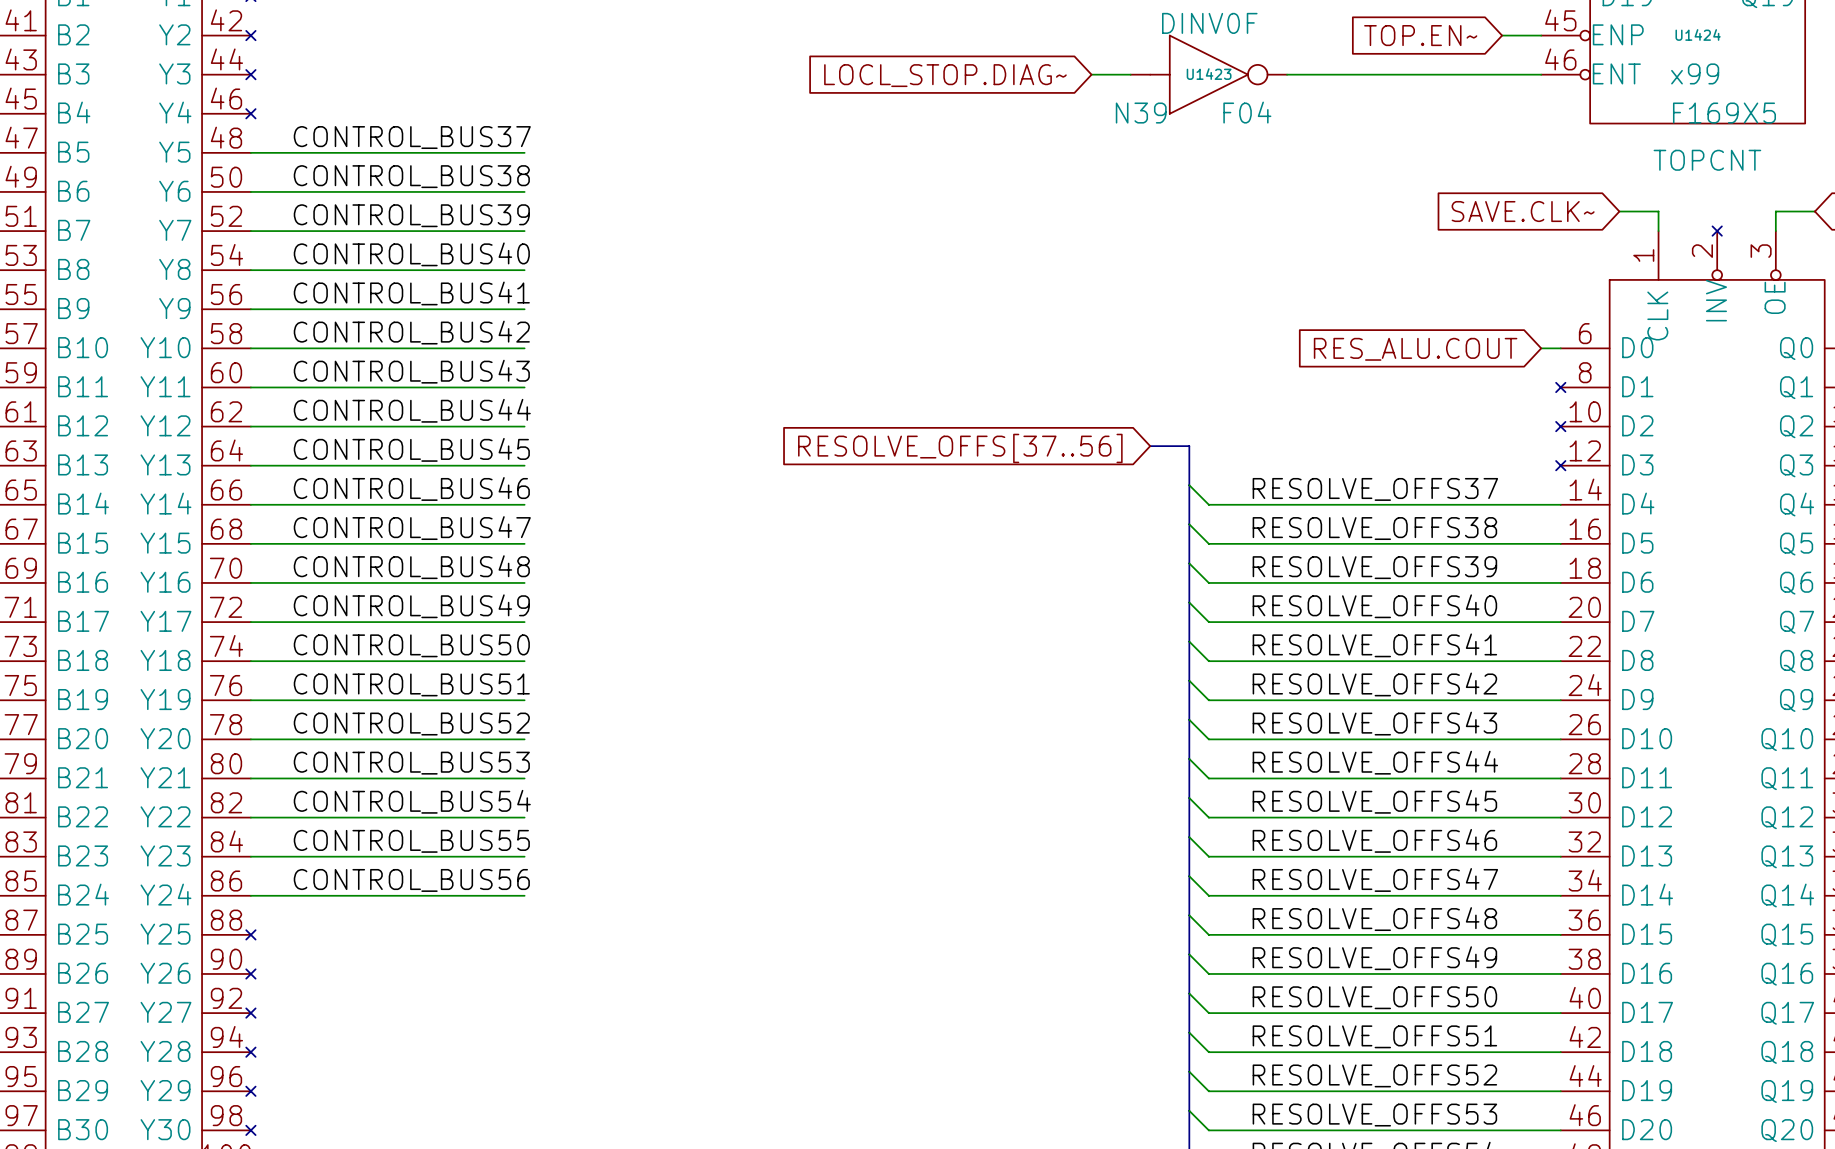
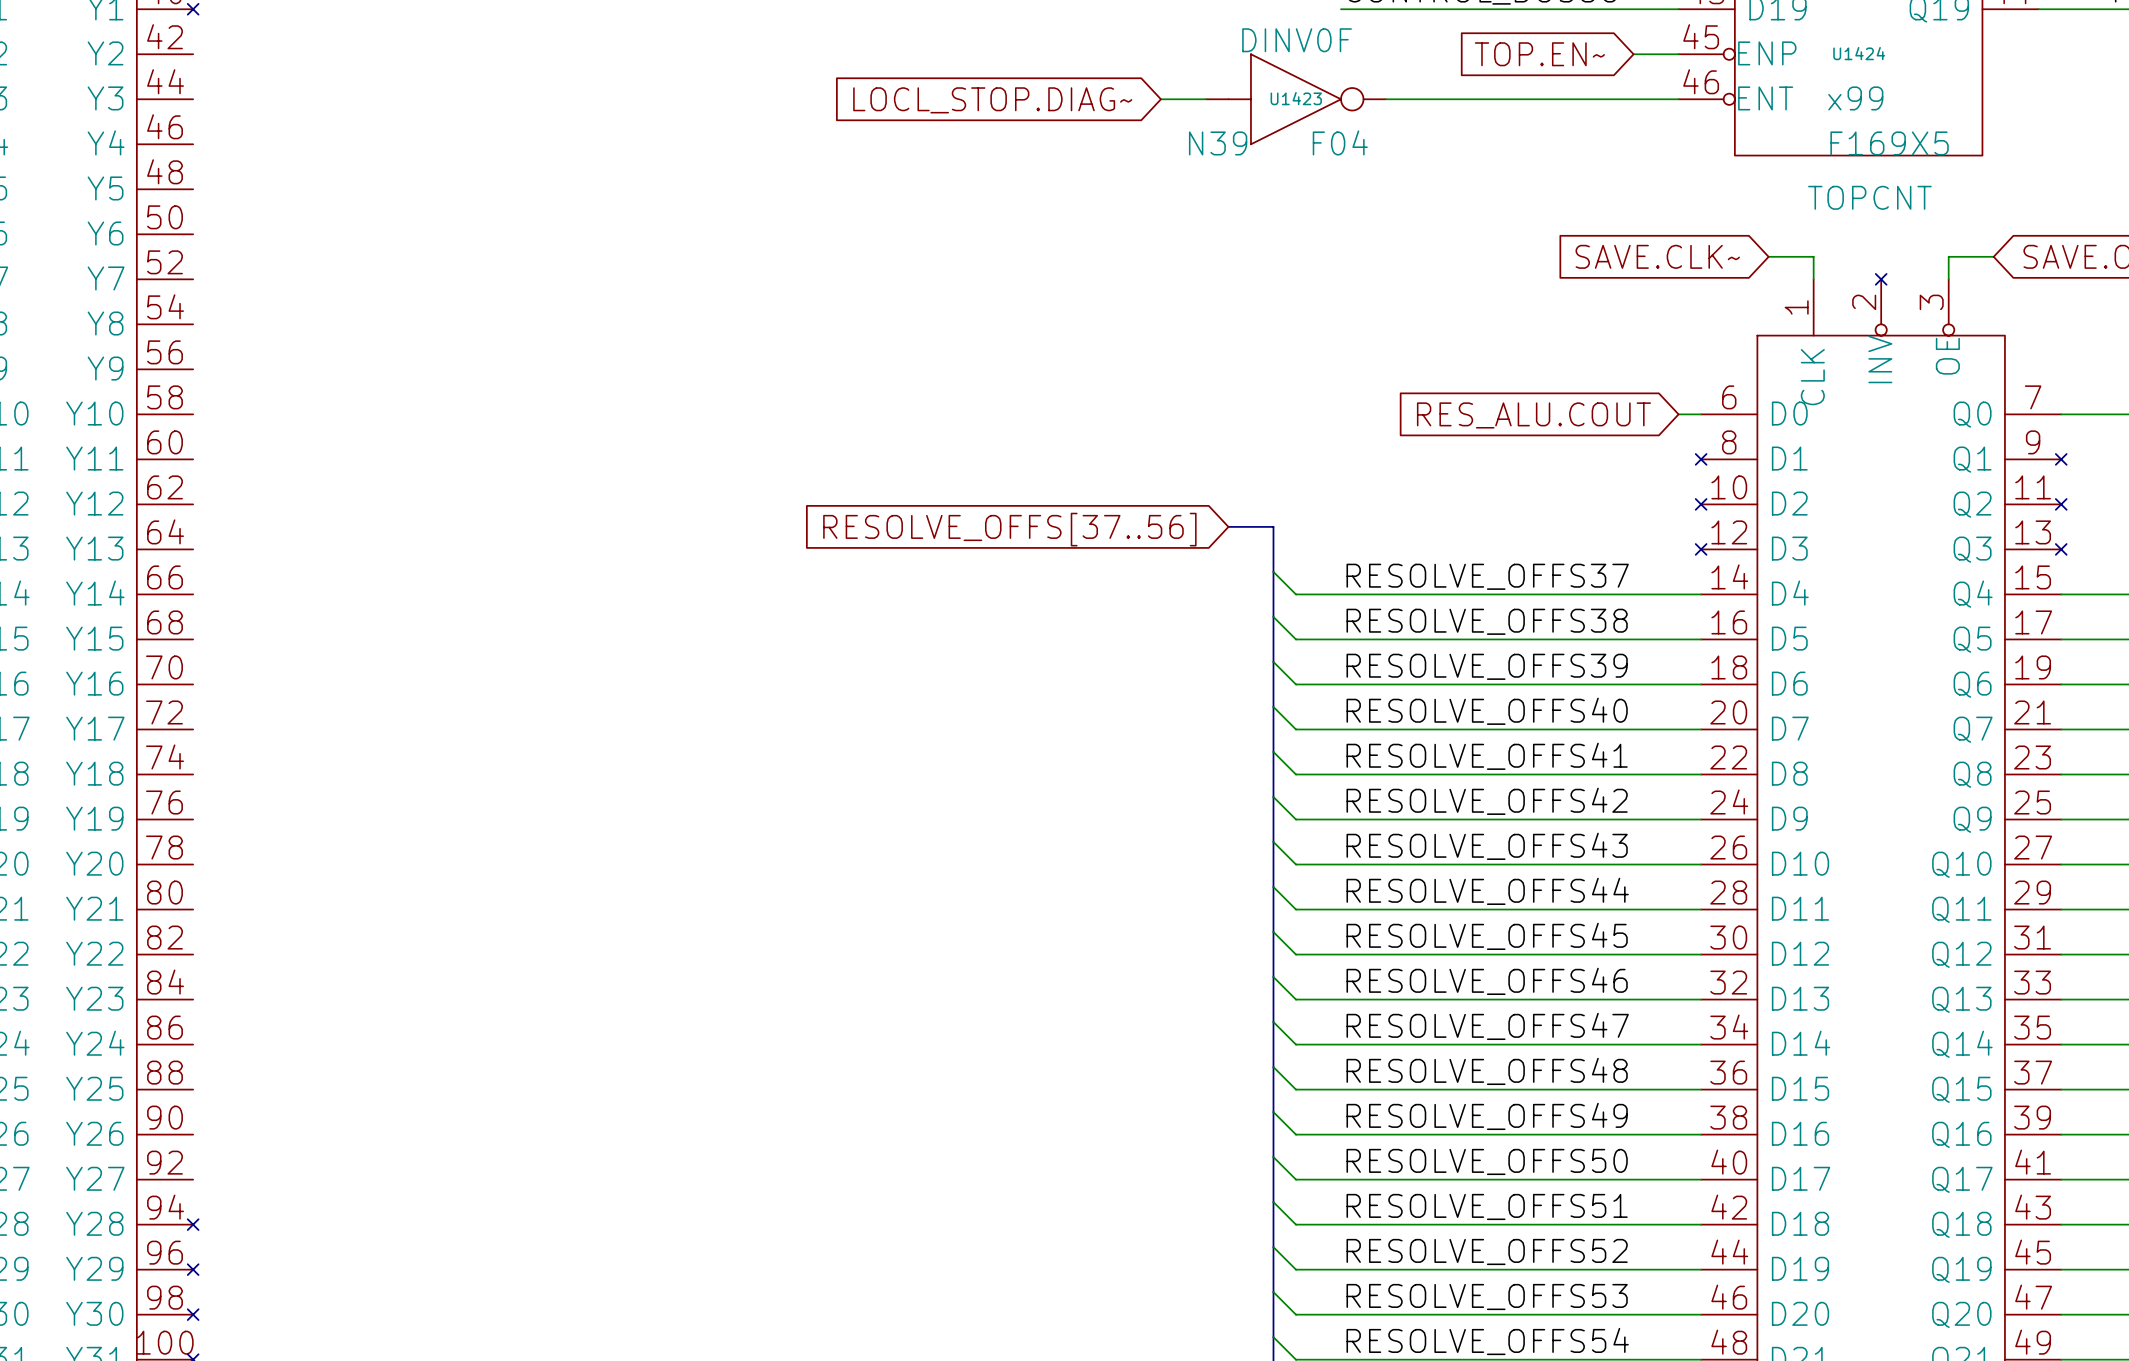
no-connect mark: (250, 35) -> none
no-connect mark: (250, 74) -> none
no-connect mark: (250, 113) -> none
label: CONTROL_BUS37 (412, 137) -> none
wire: (250, 152) (524, 152) -> none
label: CONTROL_BUS38 (411, 176) -> none
wire: (250, 191) (524, 191) -> none
label: CONTROL_BUS39 (411, 215) -> none
wire: (250, 231) (524, 231) -> none
label: CONTROL_BUS40 (411, 254) -> none
wire: (250, 270) (524, 270) -> none
label: CONTROL_BUS41 (411, 293) -> none
wire: (250, 309) (524, 309) -> none
label: CONTROL_BUS42 (411, 332) -> none
wire: (250, 348) (524, 348) -> none
label: CONTROL_BUS43 (411, 371) -> none
wire: (250, 387) (524, 387) -> none
label: CONTROL_BUS44 (412, 410) -> none
wire: (250, 426) (524, 426) -> none
label: CONTROL_BUS45 (411, 449) -> none
wire: (250, 465) (524, 465) -> none
label: CONTROL_BUS46 (411, 488) -> none
wire: (250, 504) (524, 504) -> none
label: CONTROL_BUS47 (412, 528) -> none
wire: (250, 543) (524, 543) -> none
label: CONTROL_BUS48 (411, 567) -> none
wire: (250, 582) (524, 582) -> none
label: CONTROL_BUS49 (411, 606) -> none
wire: (250, 622) (524, 622) -> none
label: CONTROL_BUS50 (411, 645) -> none
wire: (250, 661) (524, 661) -> none
label: CONTROL_BUS51 (411, 684) -> none
wire: (250, 700) (524, 700) -> none
label: CONTROL_BUS52 (411, 724) -> none
wire: (250, 739) (524, 739) -> none
label: CONTROL_BUS53 (411, 763) -> none
wire: (250, 778) (524, 778) -> none
label: CONTROL_BUS54 (412, 801) -> none
wire: (250, 817) (524, 817) -> none
label: CONTROL_BUS55 (411, 841) -> none
wire: (250, 856) (524, 856) -> none
label: CONTROL_BUS56 (411, 880) -> none
wire: (250, 895) (524, 895) -> none
no-connect mark: (250, 934) -> none
no-connect mark: (250, 973) -> none
no-connect mark: (250, 1013) -> none

